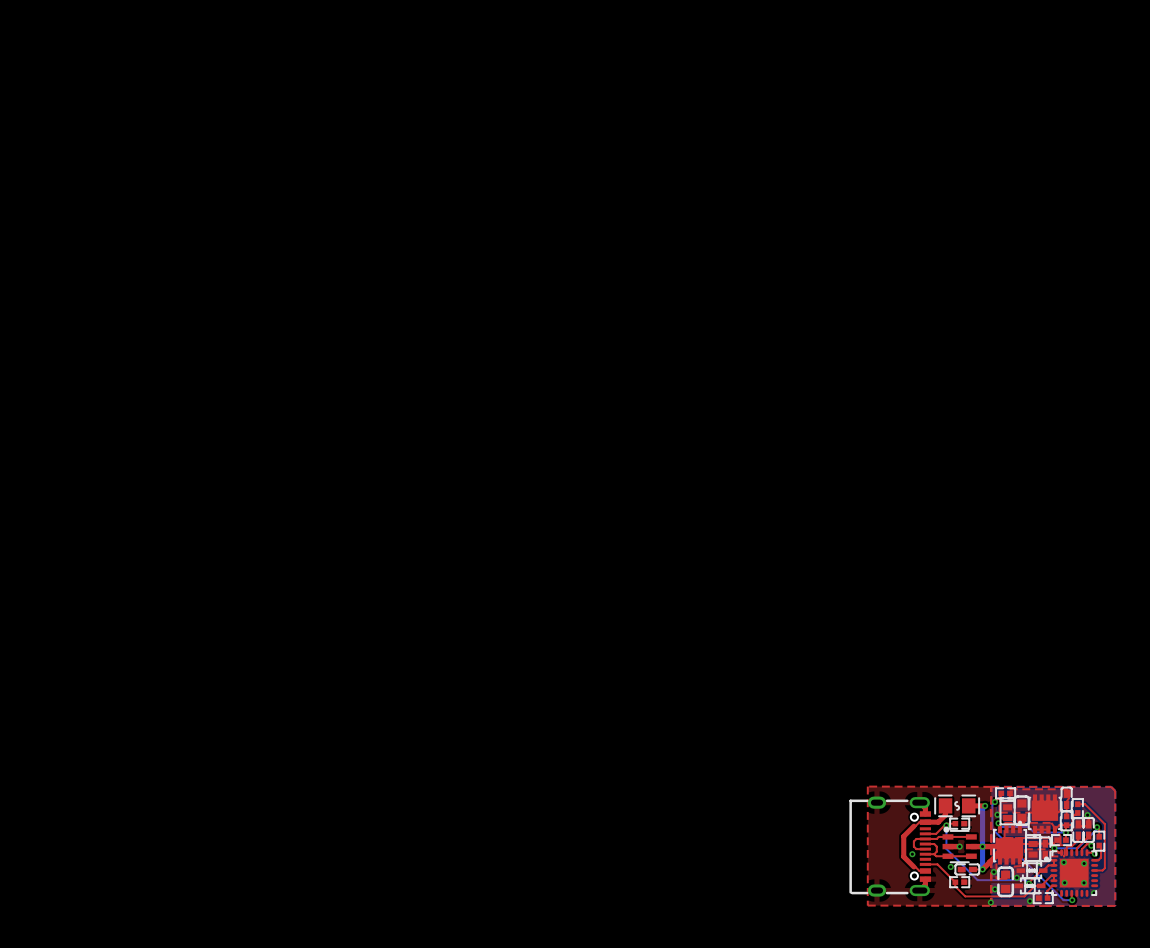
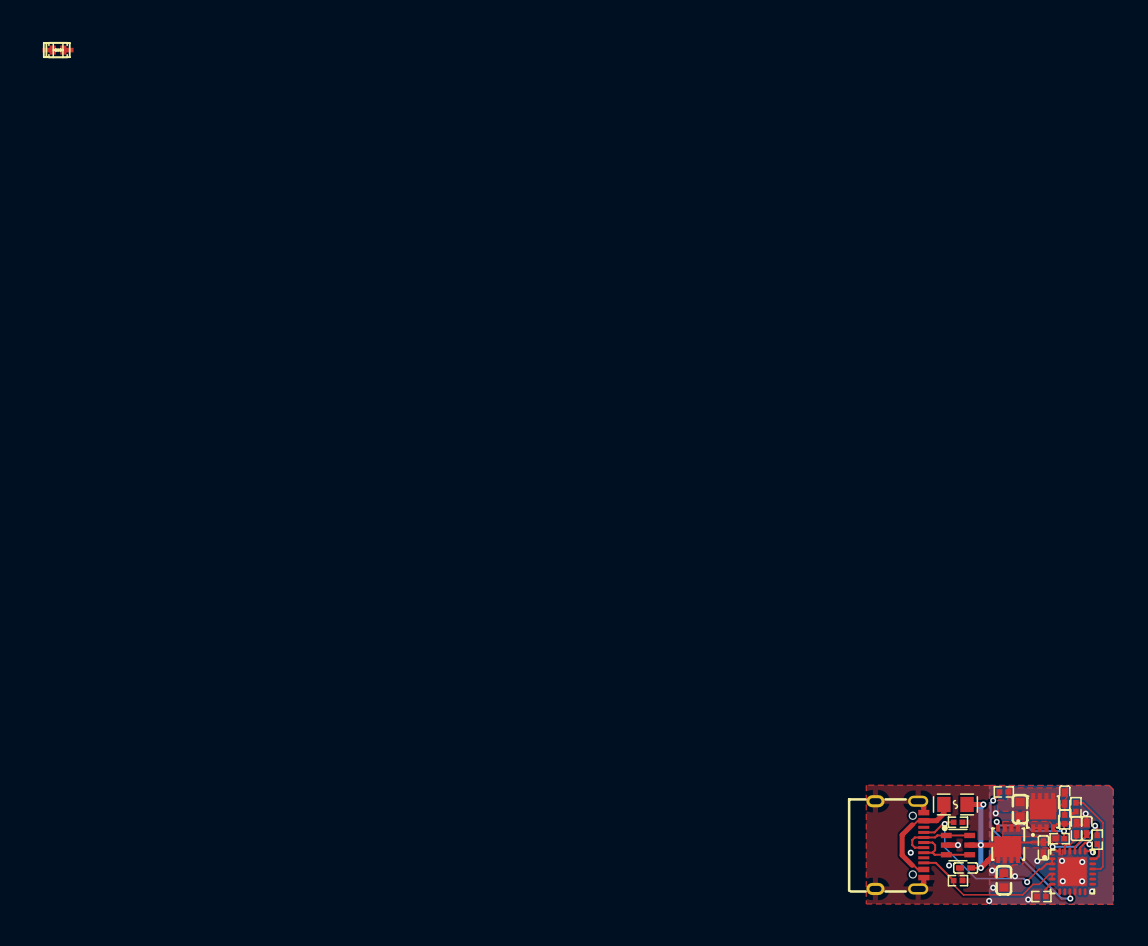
part: none -> (56, 50)
part: none -> (58, 50)
part: (1007, 811) -> none
part: (1033, 848) -> none
part: (1032, 870) -> none
part: (1030, 885) -> none

